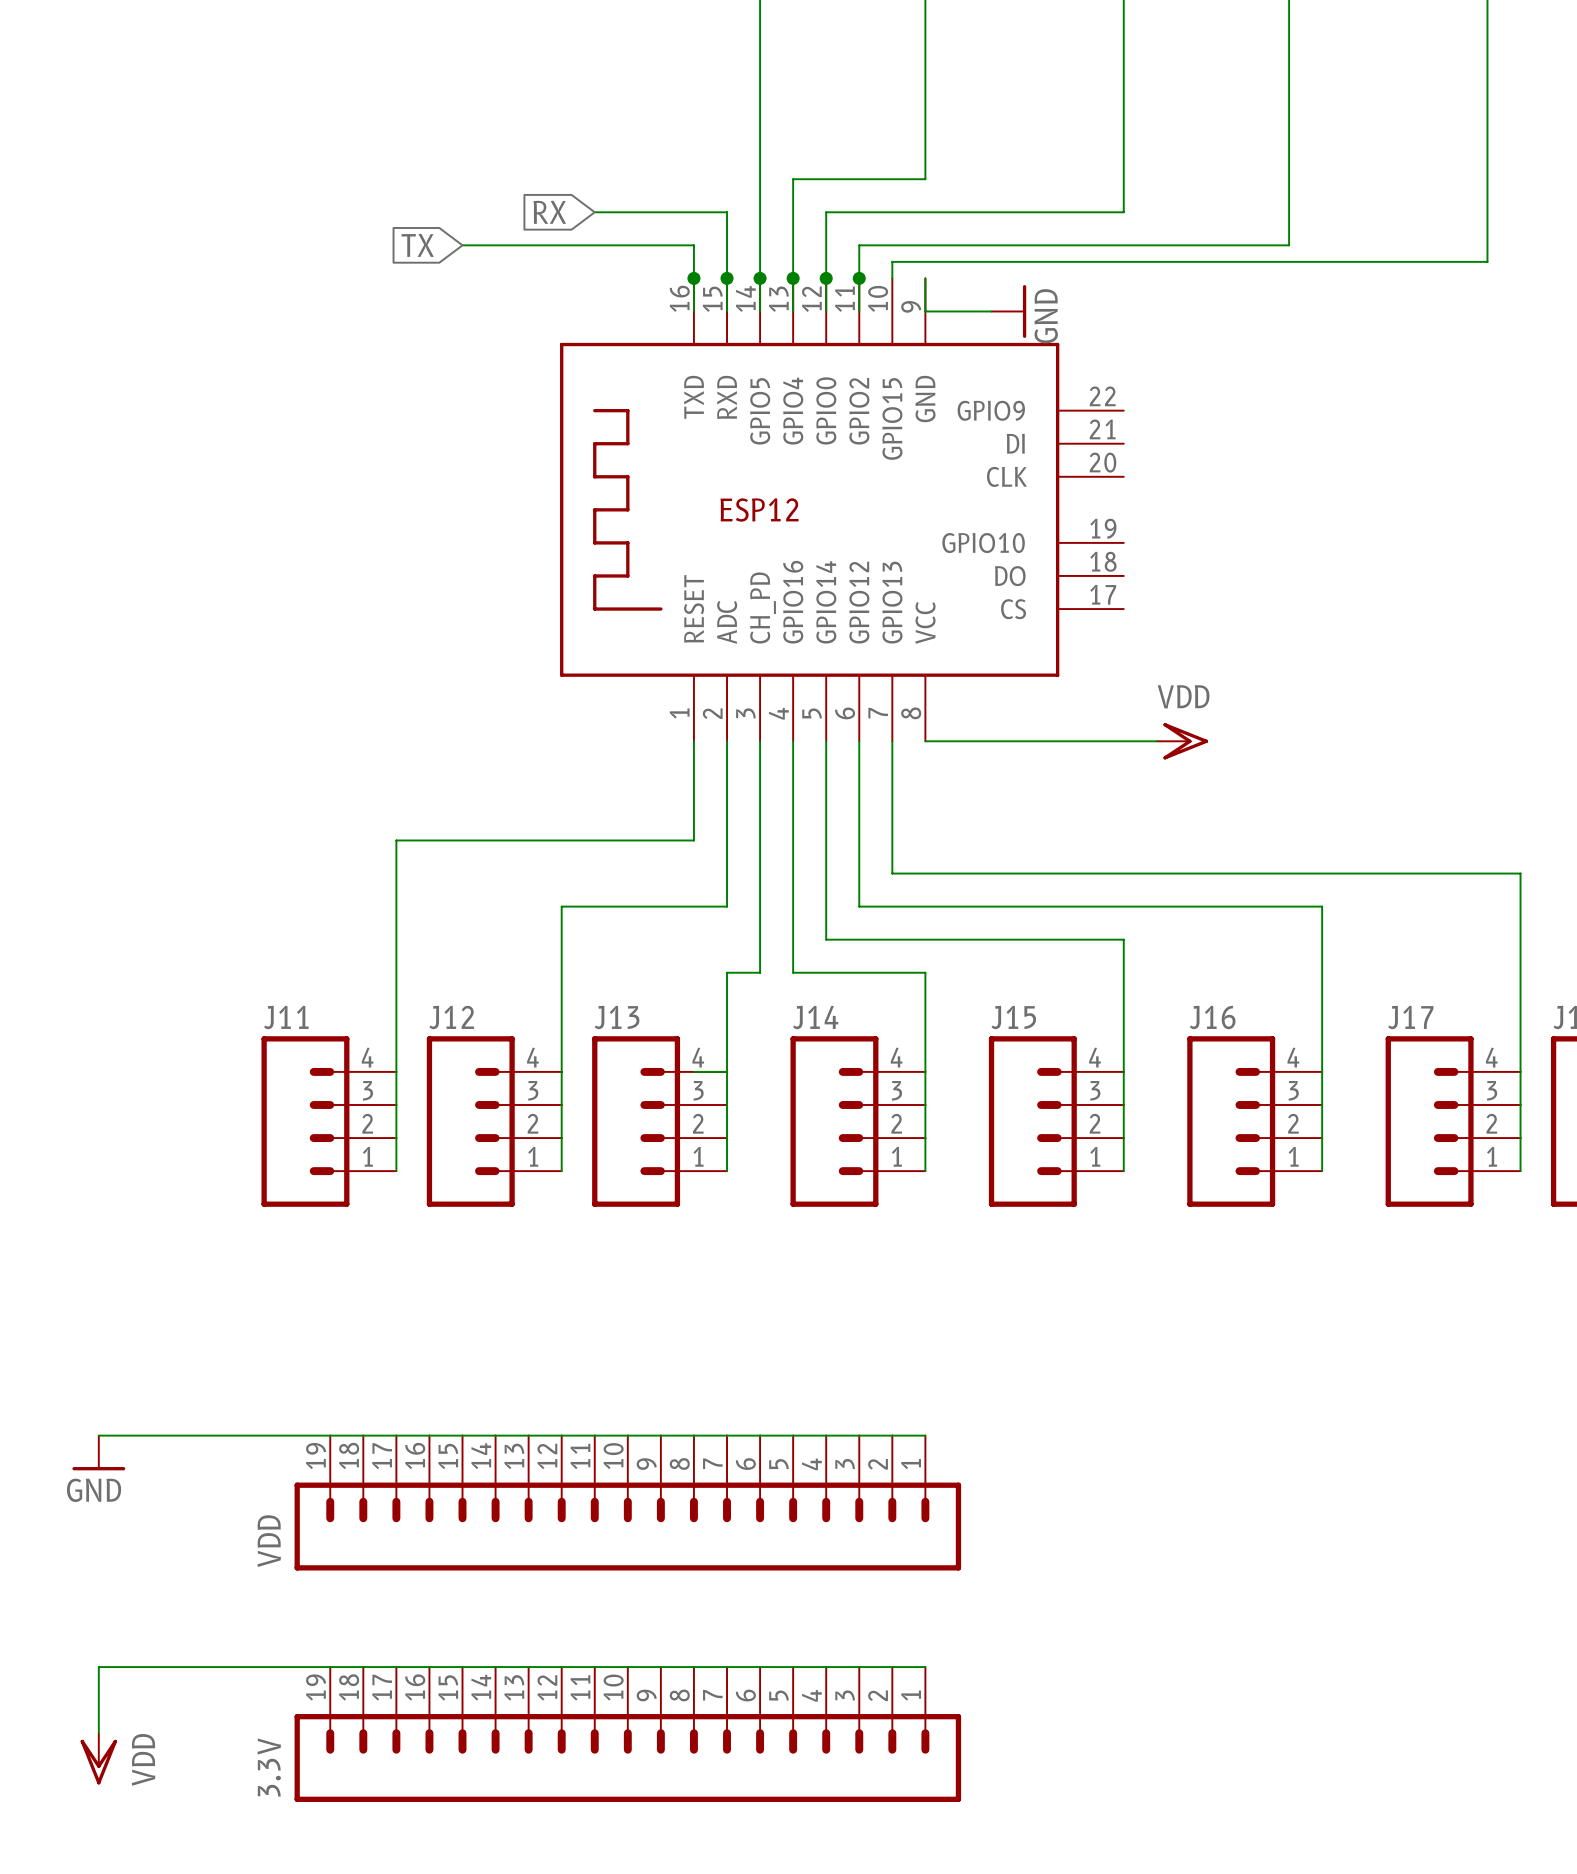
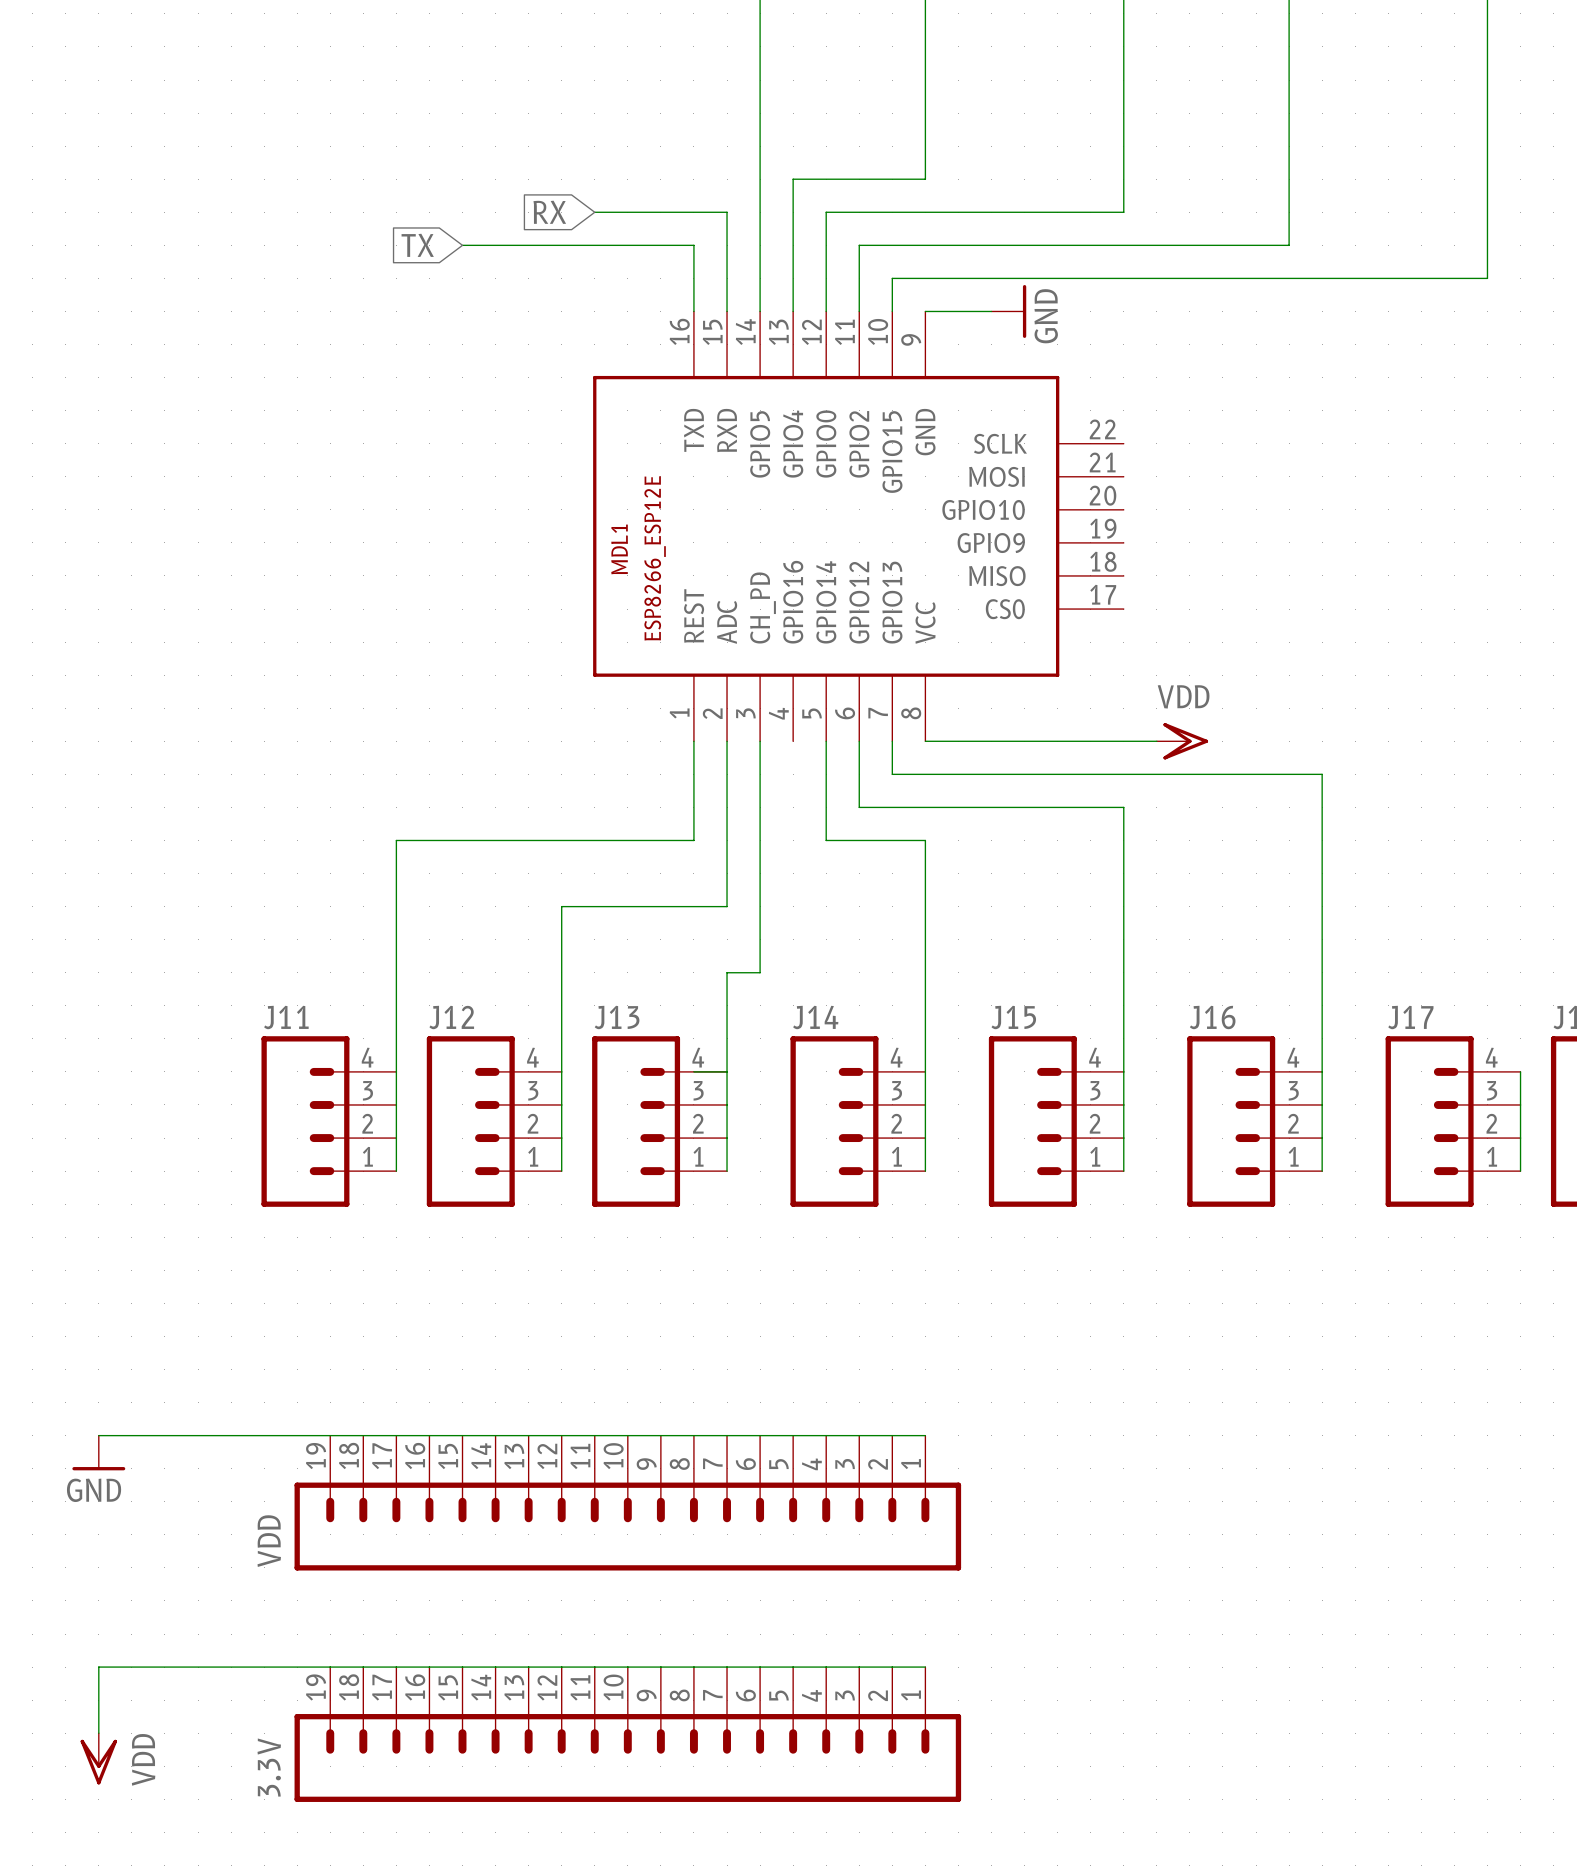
wire: (1487, 261) (892, 261) (892, 278) -> (1487, 261) (1487, 278) (892, 278) (892, 311)
junction: (693, 278) -> none
junction: (727, 278) -> none
junction: (760, 278) -> none
junction: (793, 278) -> none
junction: (826, 278) -> none
junction: (859, 278) -> none
wire: (925, 278) (925, 311) -> none
part: (841, 509) -> none
MDL1: none -> (858, 526)
wire: (793, 741) (793, 972) (925, 972) -> (826, 840) (925, 840) (925, 972)
wire: (892, 774) (892, 873) (1520, 873) (1520, 1071) -> none
wire: (859, 807) (859, 906) (1322, 906) -> (892, 774) (1322, 774) (1322, 906)
wire: (826, 840) (826, 939) (1123, 939) -> (859, 807) (1123, 807) (1123, 939)

